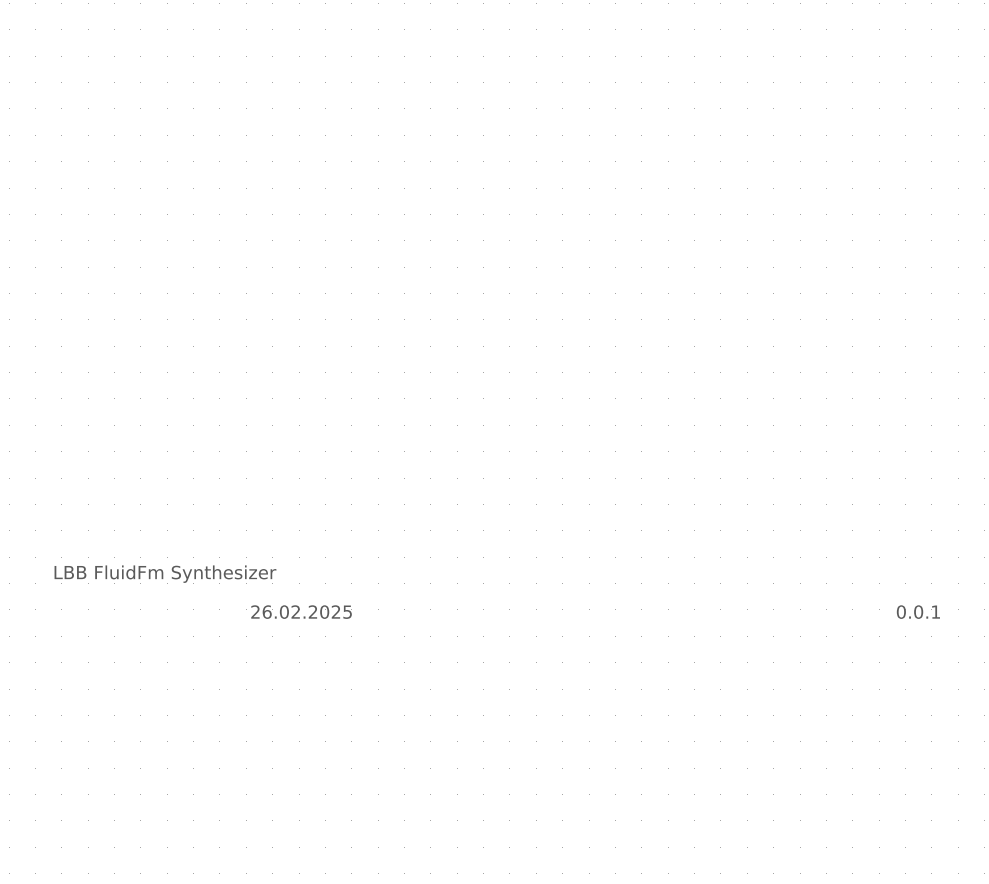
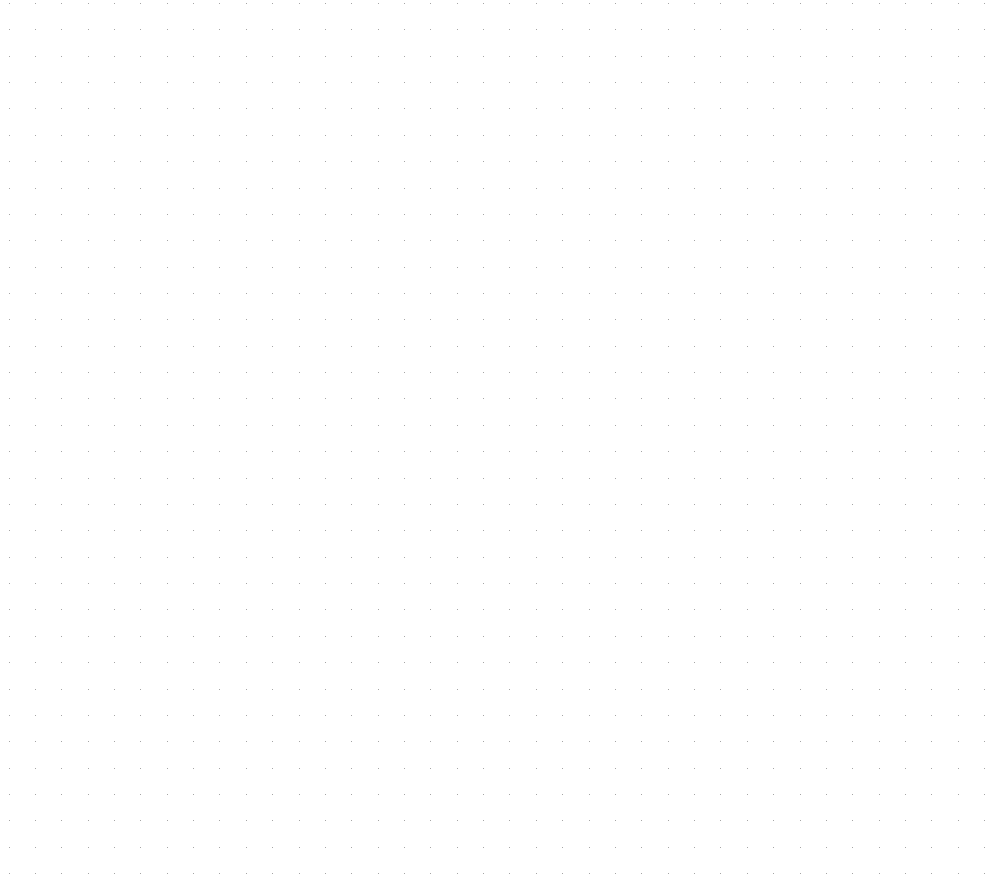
text: LBB FluidFm Synthesizer (165, 574) -> none
text: 26.02.2025 (301, 612) -> none
text: 0.0.1 (918, 612) -> none

